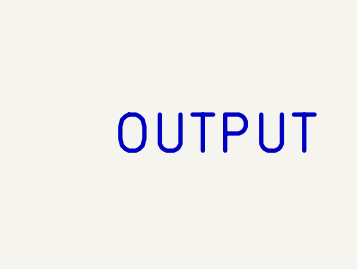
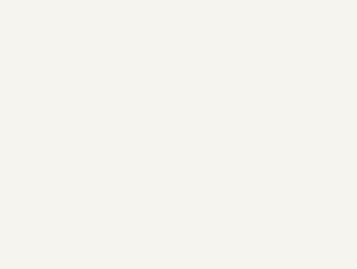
text: OUTPUT (217, 132) -> none

